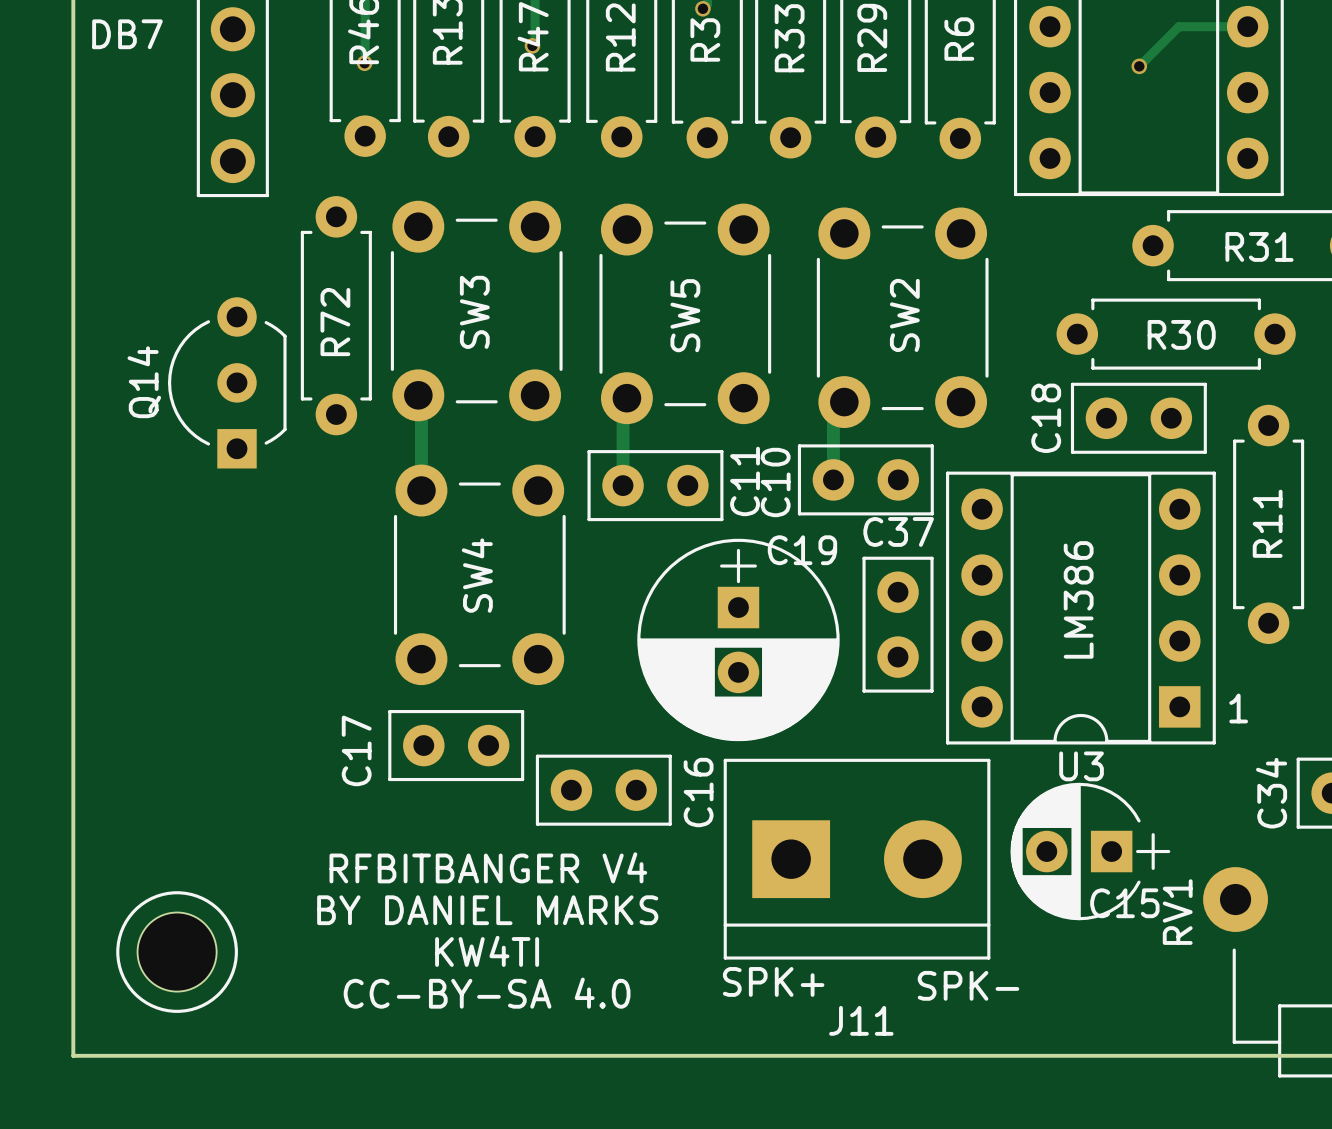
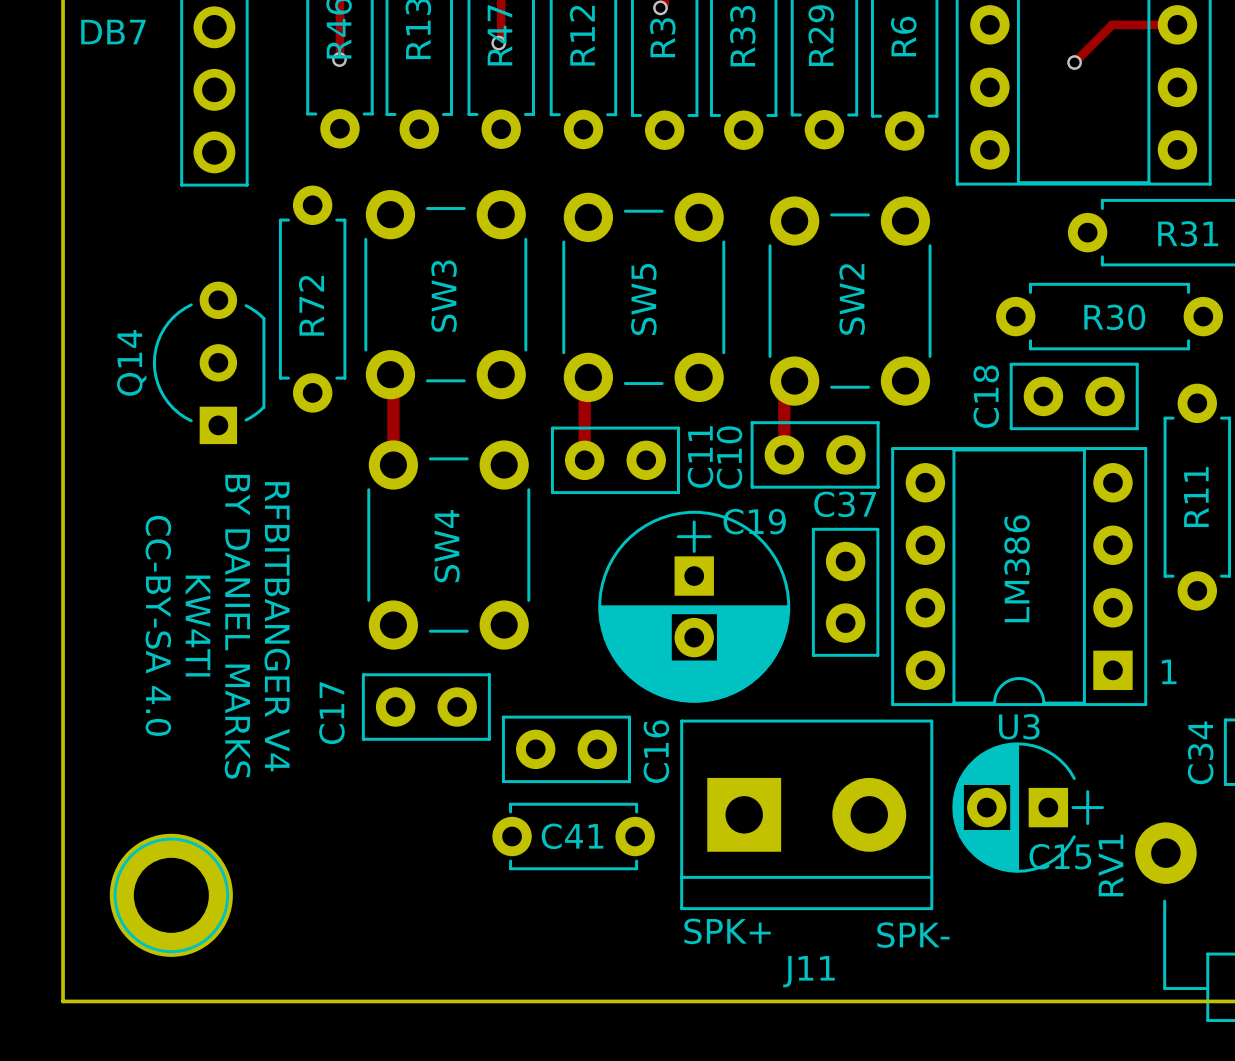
text rotation: 0° (488, 867) -> 90° clockwise (277, 626)
C41: none -> (573, 836)
part footprint: [116, 891, 238, 1013] -> [109, 833, 233, 957]
text rotation: 0° (487, 910) -> 90° clockwise (237, 626)
text rotation: 0° (487, 951) -> 90° clockwise (197, 626)
text position: KW4TI (487, 951) -> KW4TI (197, 626)
text rotation: 0° (487, 993) -> 90° clockwise (158, 625)
text position: CC-BY-SA 4.0 (487, 993) -> CC-BY-SA 4.0 (158, 625)

